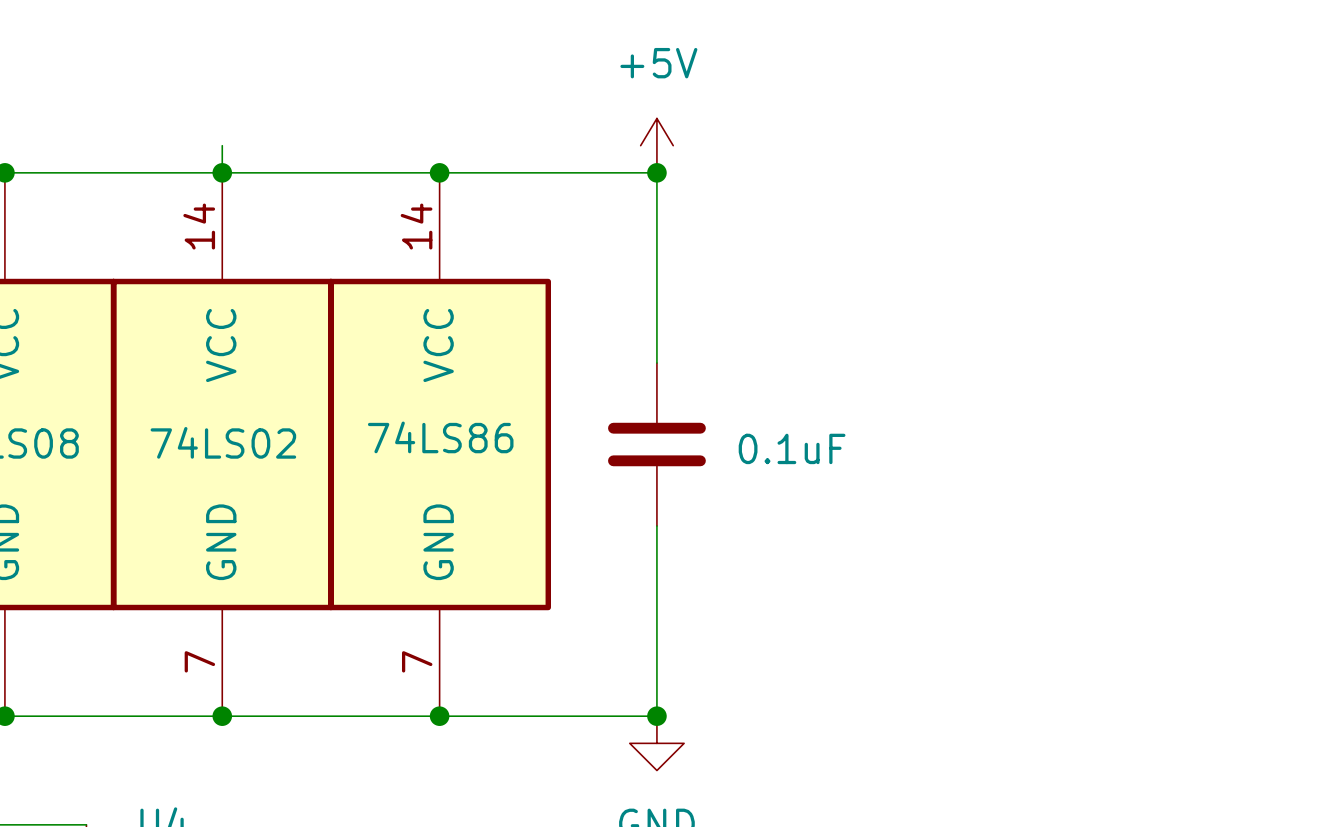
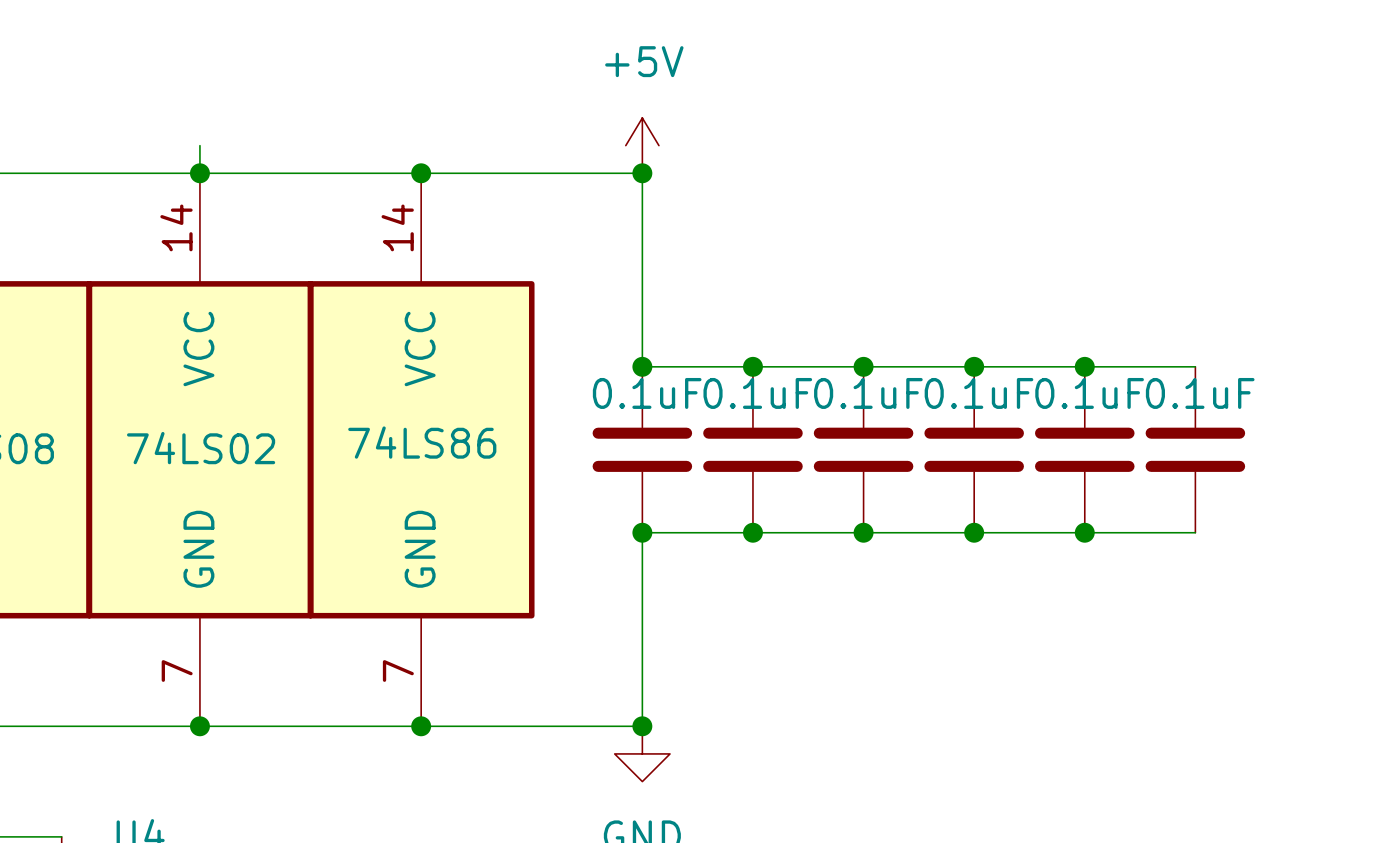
wire: none -> (642, 366) (1195, 366)
junction: none -> (642, 366)
junction: none -> (752, 366)
junction: none -> (863, 366)
junction: none -> (974, 366)
junction: none -> (1084, 366)
part: none -> 0.1uF (752, 449)
part: none -> 0.1uF (863, 449)
part: none -> 0.1uF (974, 449)
part: none -> 0.1uF (1084, 449)
part: none -> 0.1uF (1195, 449)
part value position: 0.1uF (792, 448) -> 0.1uF (647, 393)
wire: none -> (642, 532) (1195, 532)
junction: none -> (642, 532)
junction: none -> (752, 532)
junction: none -> (863, 532)
junction: none -> (974, 532)
junction: none -> (1084, 532)

